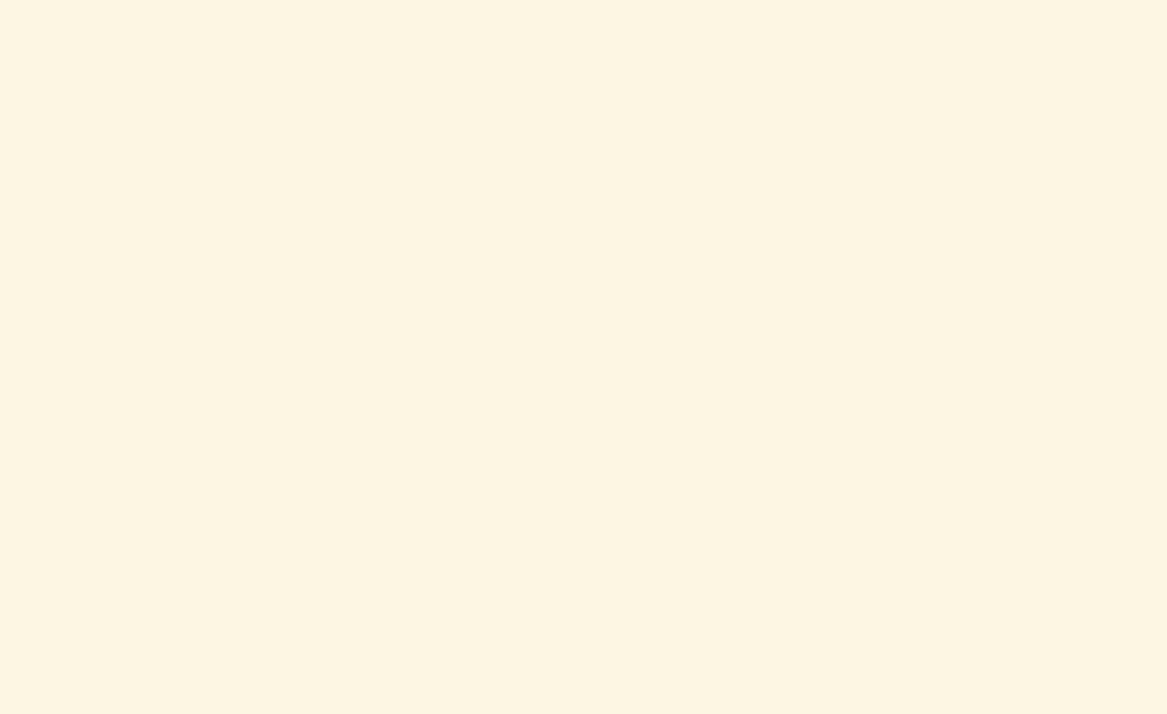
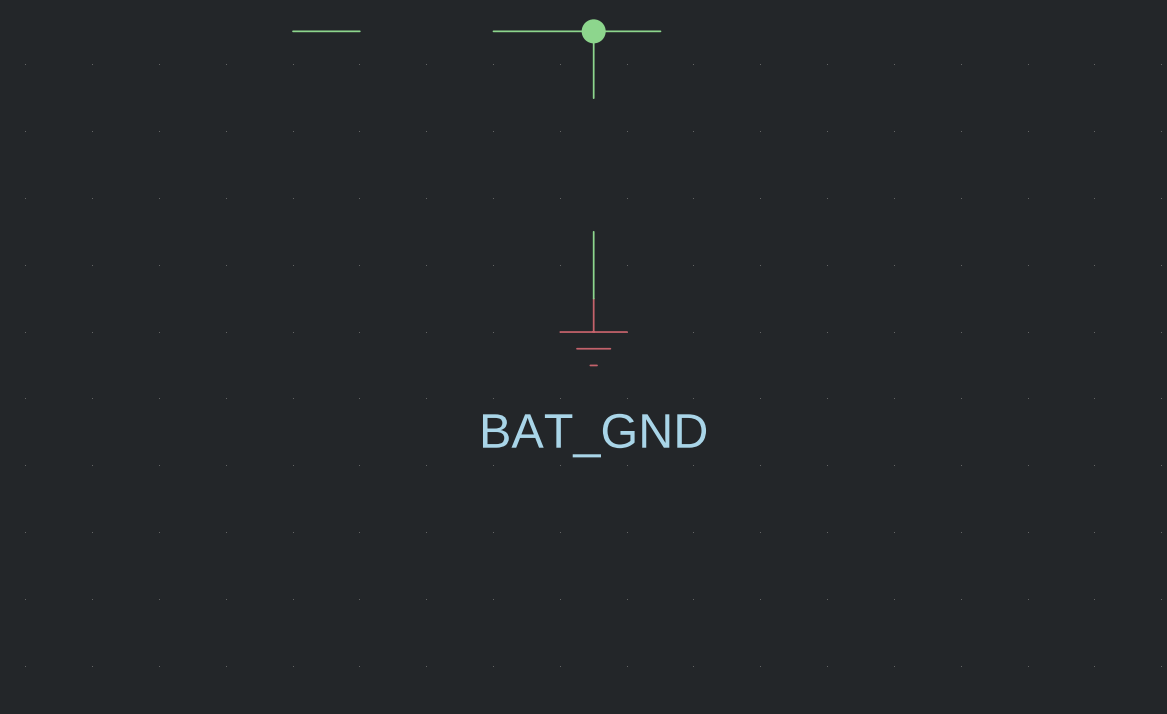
wire: none -> (293, 31) (359, 31)
wire: none -> (493, 31) (660, 31)
wire: none -> (593, 31) (593, 98)
junction: none -> (593, 31)
wire: none -> (593, 231) (593, 298)
power symbol: none -> BAT_GND (593, 332)

